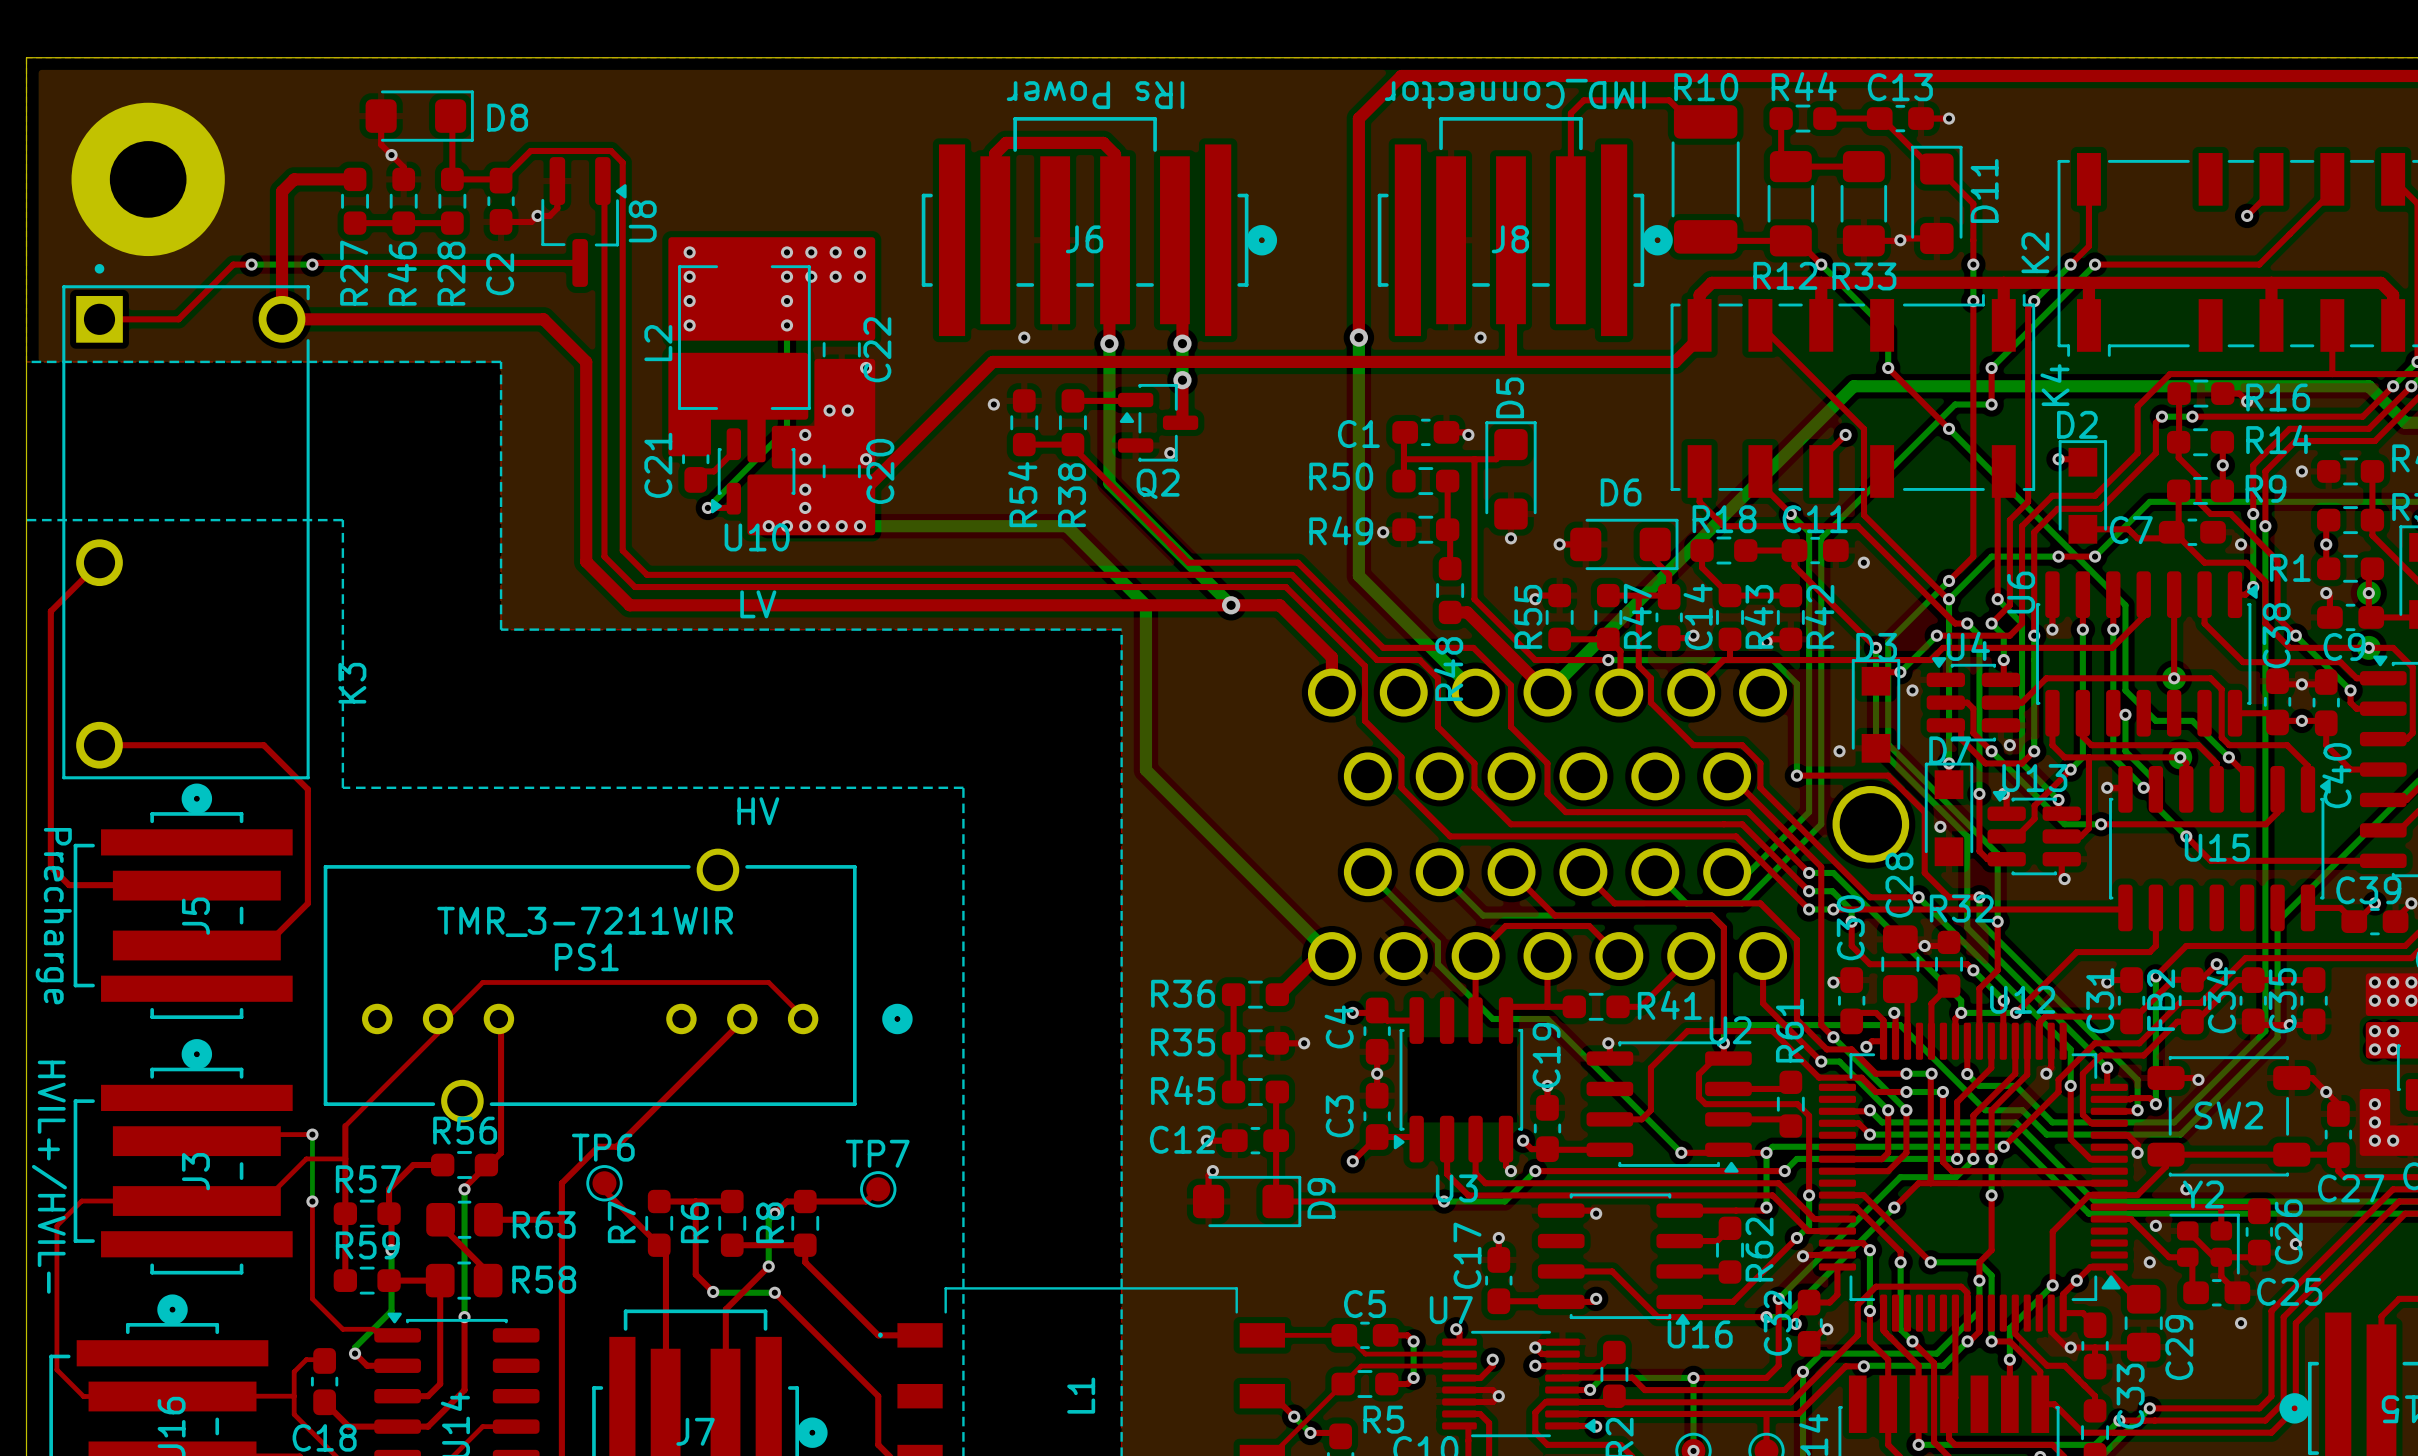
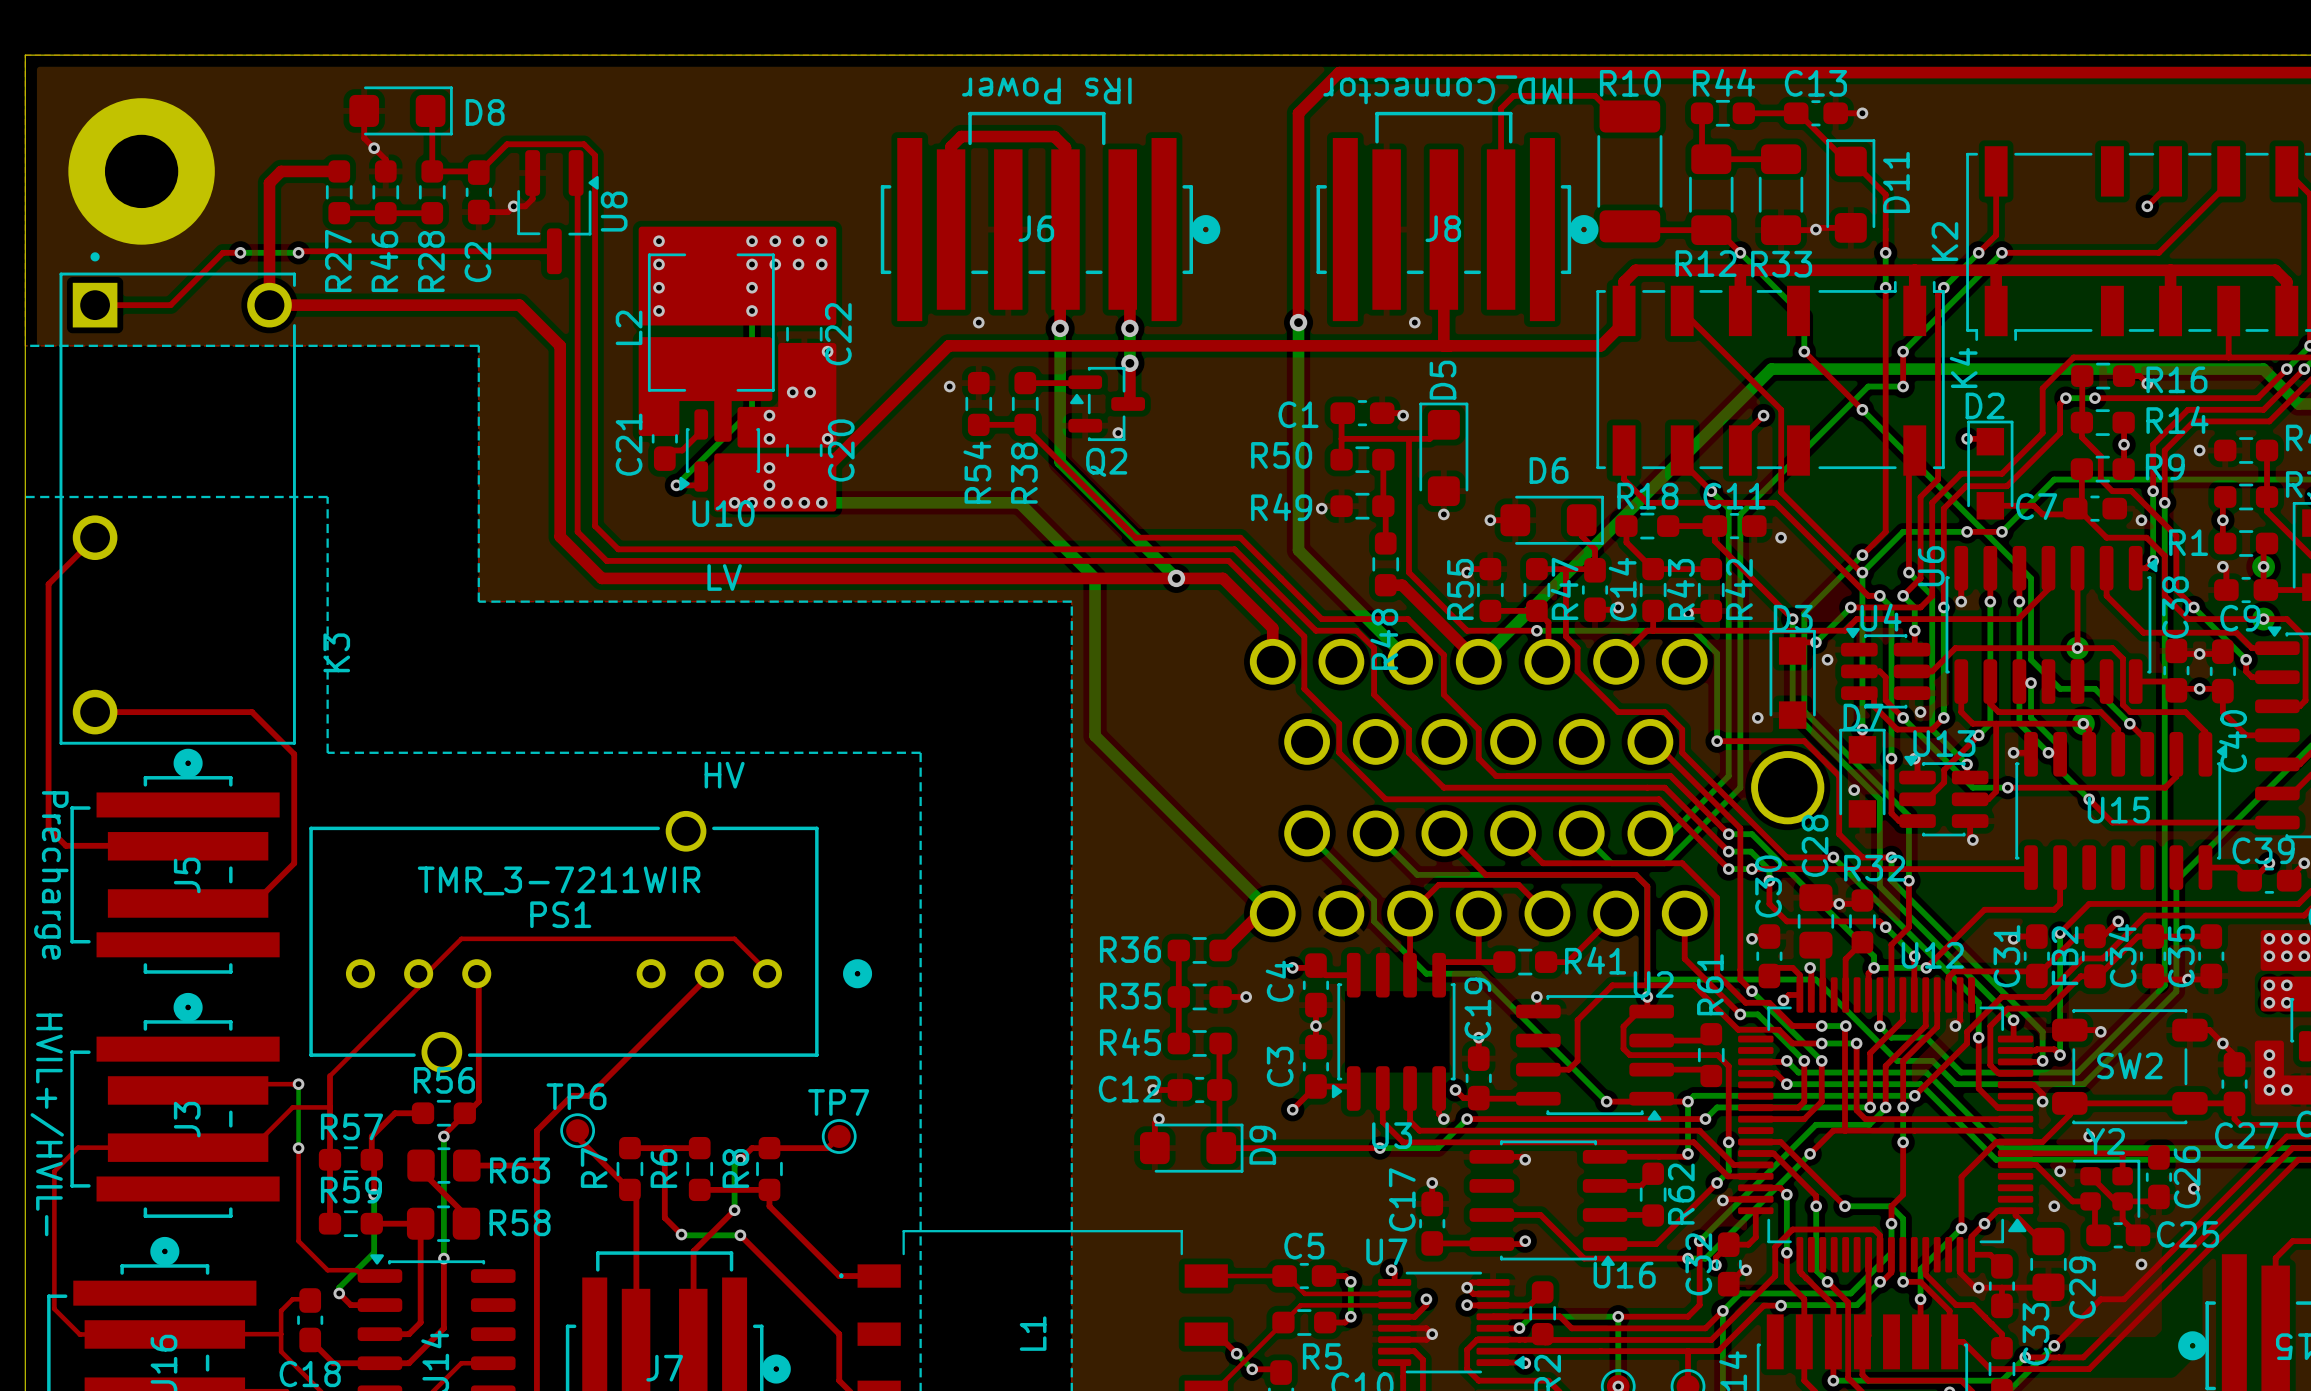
top track: (2271, 1311) (2271, 1396) (2259, 1408) (2149, 1408) -> (2170, 1252) (2124, 1299) (2100, 1299) (2054, 1345)
top track: (2283, 1317) (2283, 1402) (2265, 1420) (2180, 1420) -> (2182, 1258) (2083, 1357)
top track: (2295, 1323) (2295, 1408) (2271, 1432) (2186, 1432) -> (2193, 1264) (2089, 1369)

